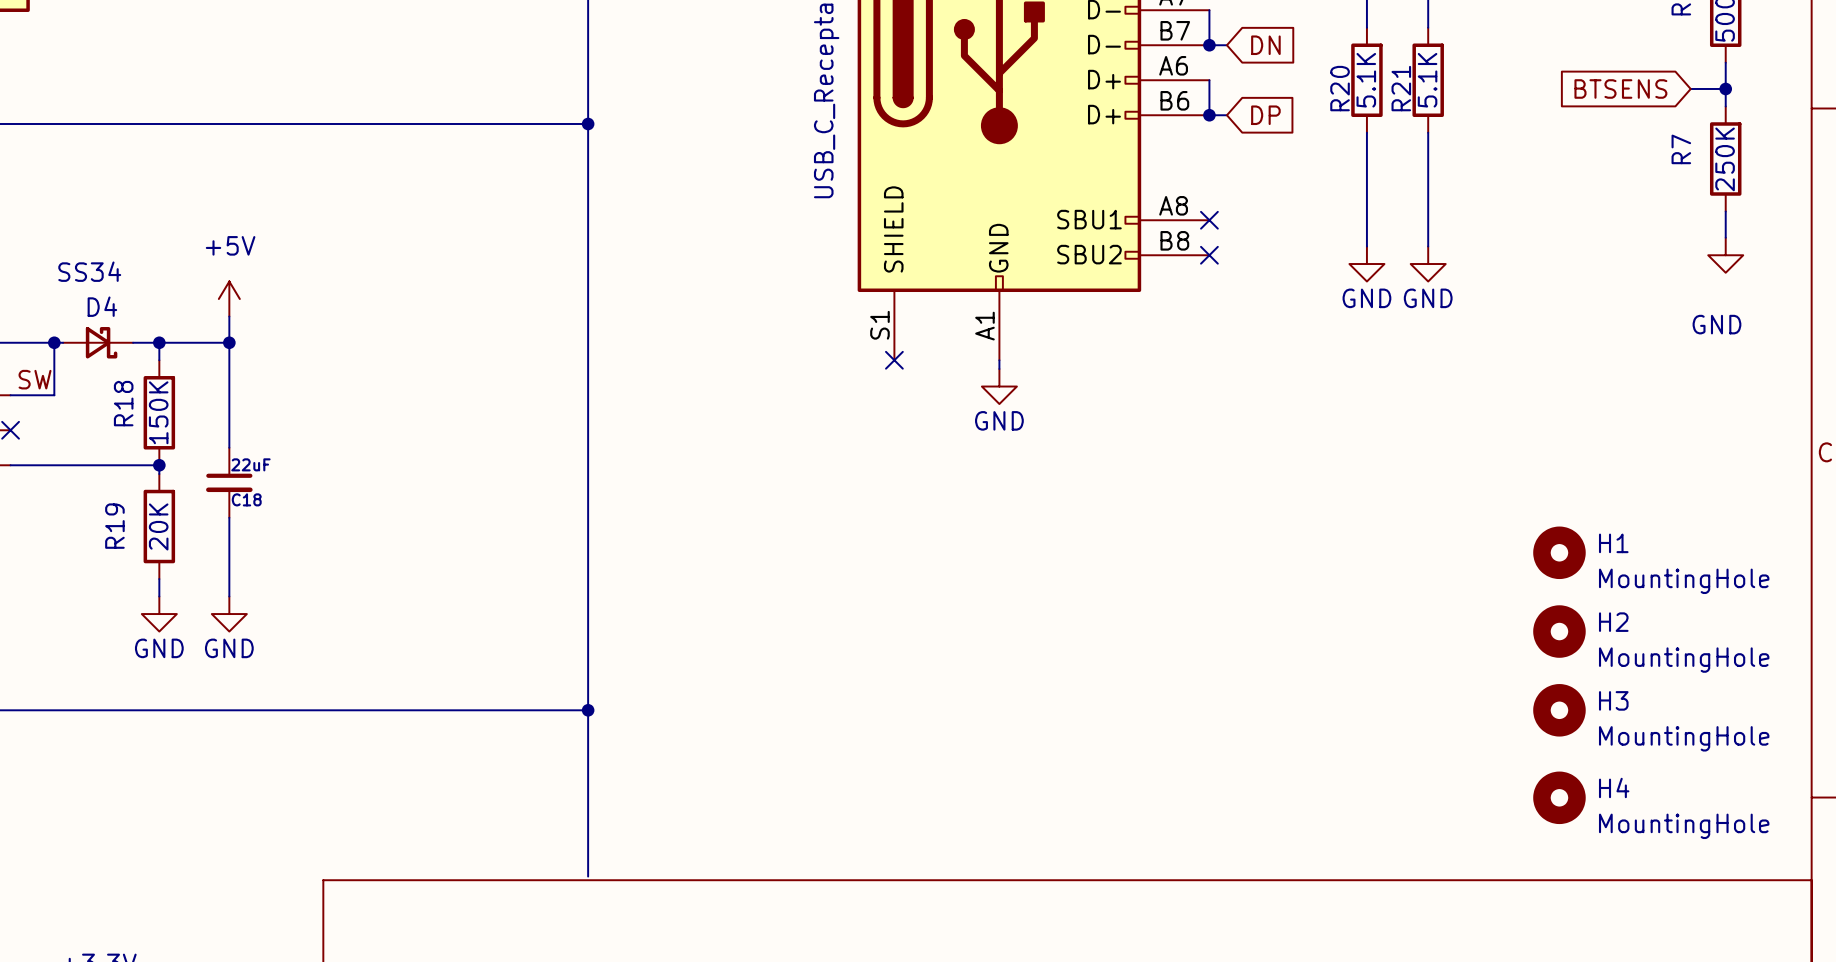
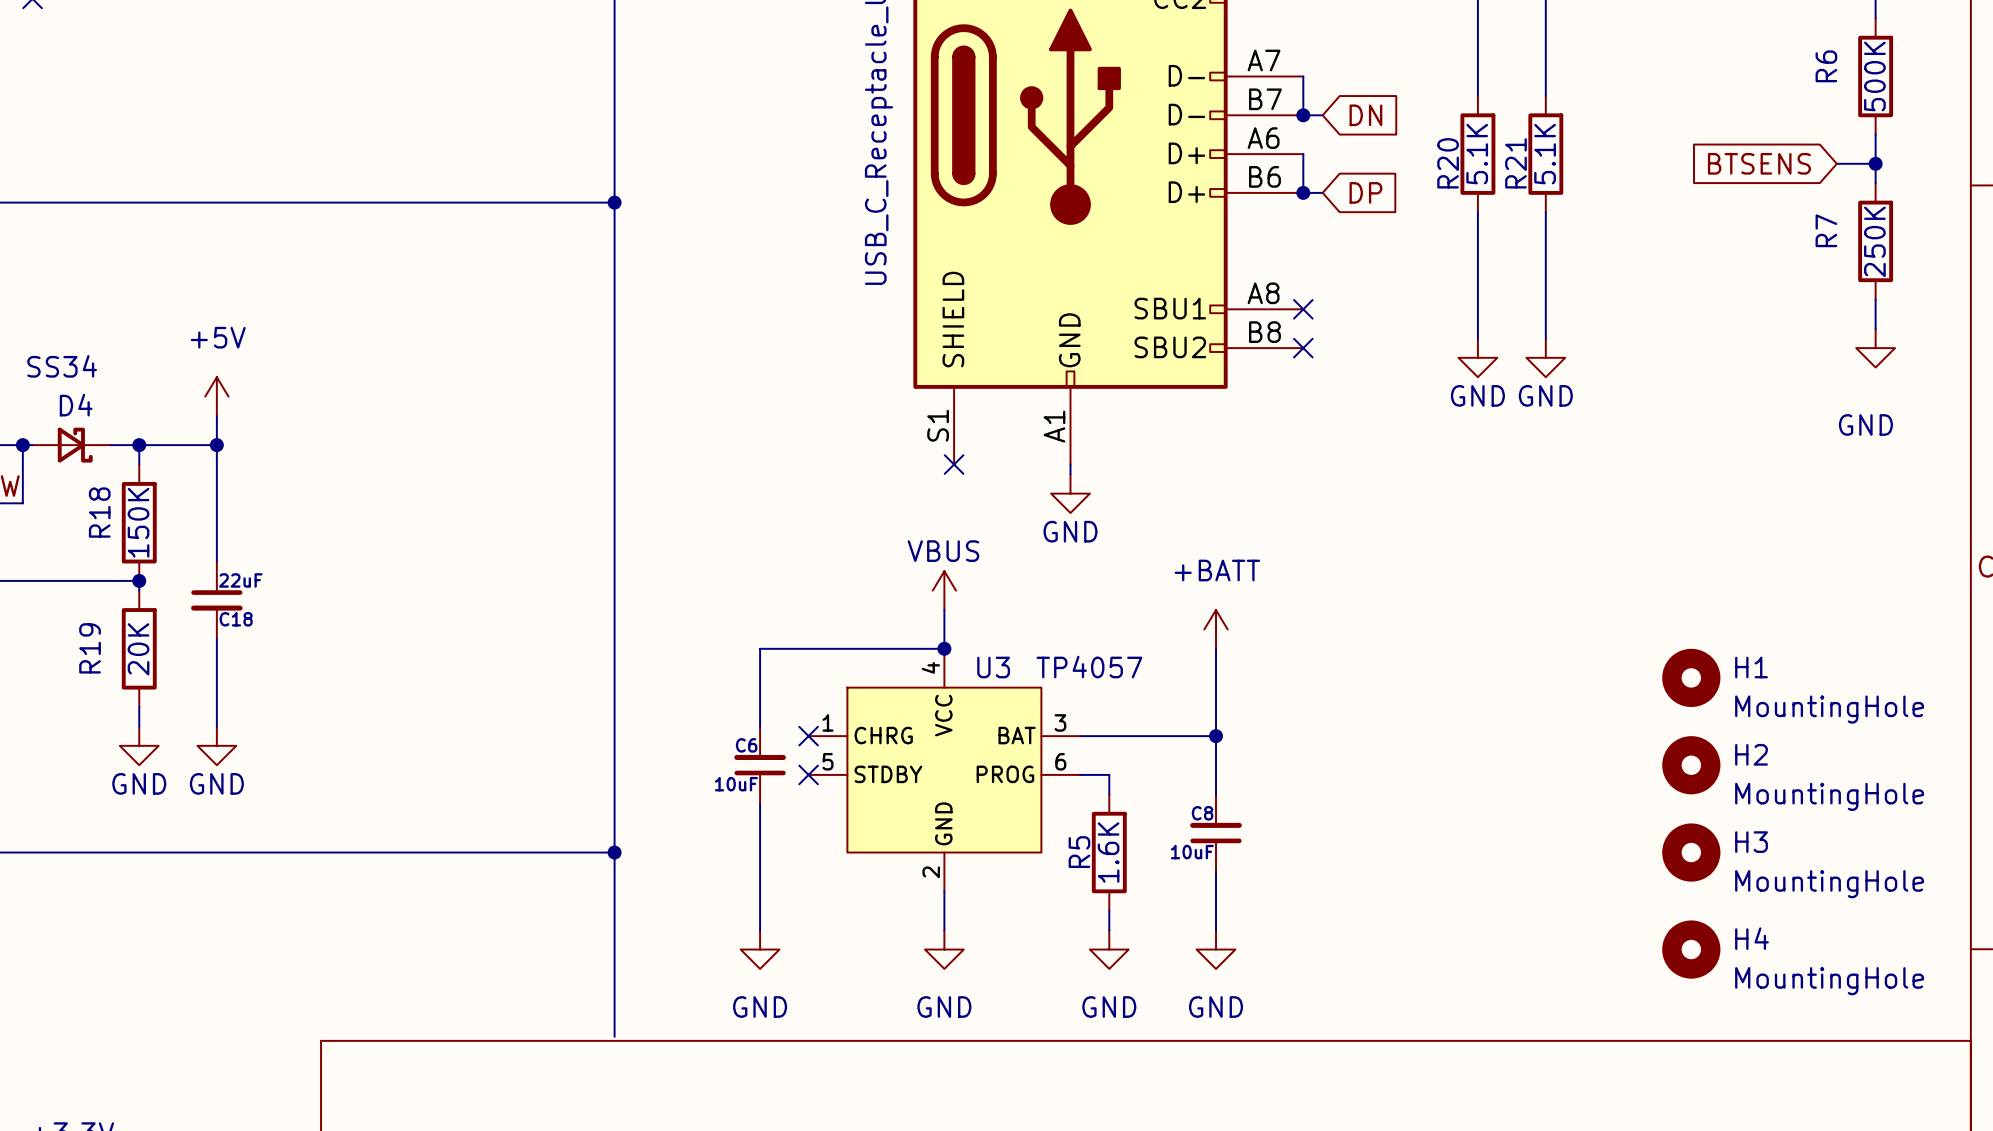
power symbol: none -> VBUS (944, 590)
wire: none -> (944, 610) (944, 648) (760, 648) (760, 726)
power symbol: none -> +BATT (1216, 629)
junction: none -> (944, 648)
wire: none -> (1216, 648) (1216, 794)
no-connect mark: none -> (808, 736)
wire: none -> (1080, 736) (1216, 736)
junction: none -> (1216, 736)
C6: none -> 10uF (760, 765)
U3: none -> TP4057 (944, 770)
no-connect mark: none -> (808, 774)
wire: none -> (1080, 774) (1109, 774) (1109, 794)
wire: none -> (760, 804) (760, 930)
C8: none -> 10uF (1216, 833)
R5: none -> 1.6K (1109, 852)
wire: none -> (1216, 871) (1216, 930)
wire: none -> (944, 891) (944, 930)
wire: none -> (1109, 910) (1109, 930)
power symbol: none -> GND (760, 949)
power symbol: none -> GND (944, 949)
power symbol: none -> GND (1109, 949)
power symbol: none -> GND (1216, 949)

